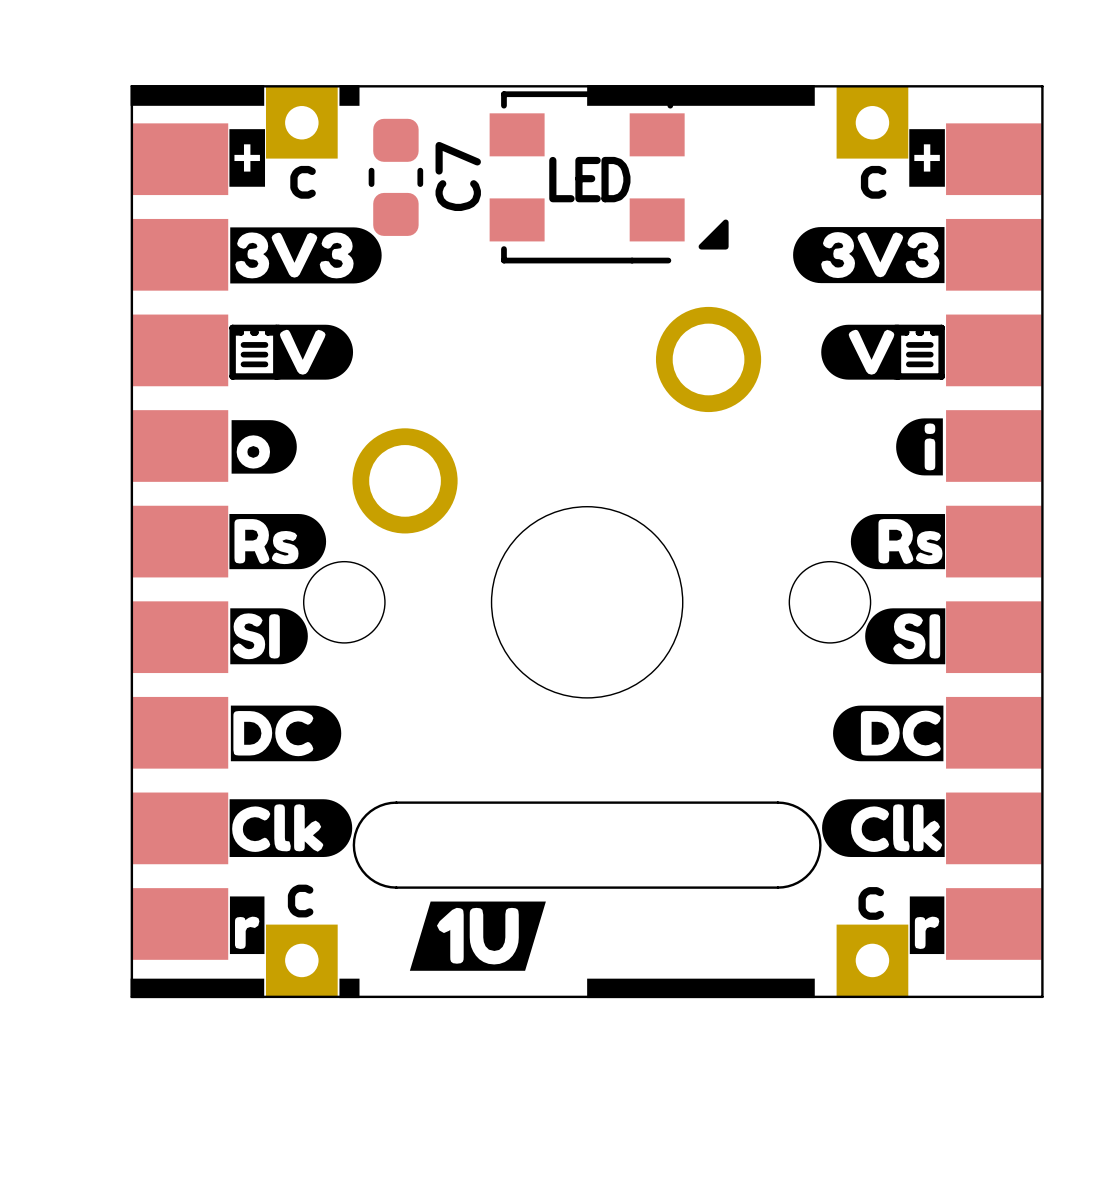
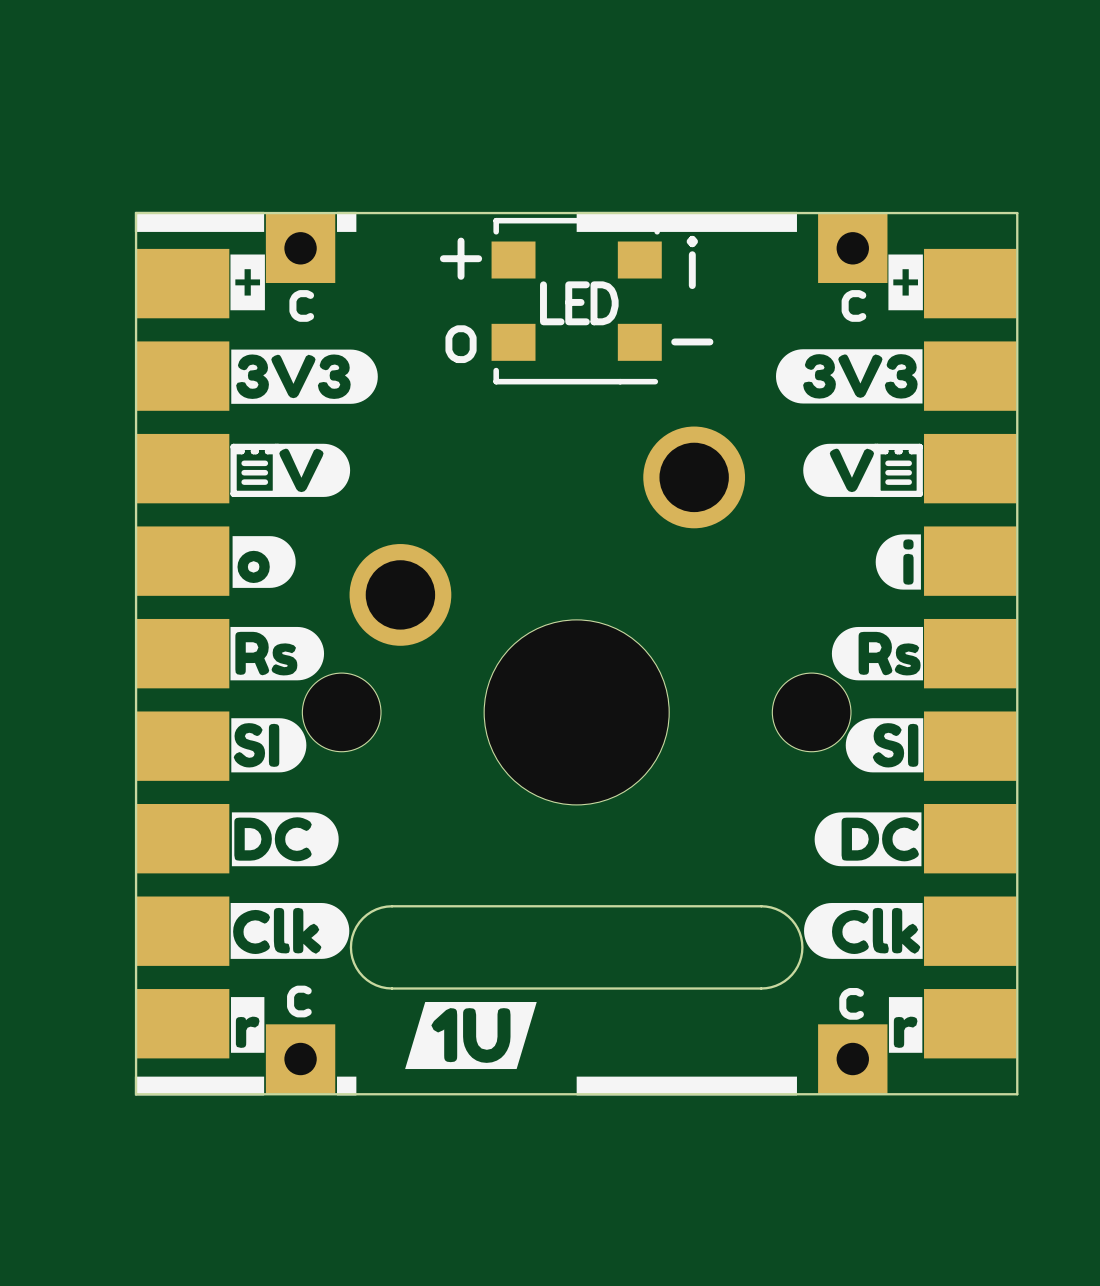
part footprint: [489, 91, 729, 264] -> [491, 217, 662, 385]
C7: (395, 177) -> none

